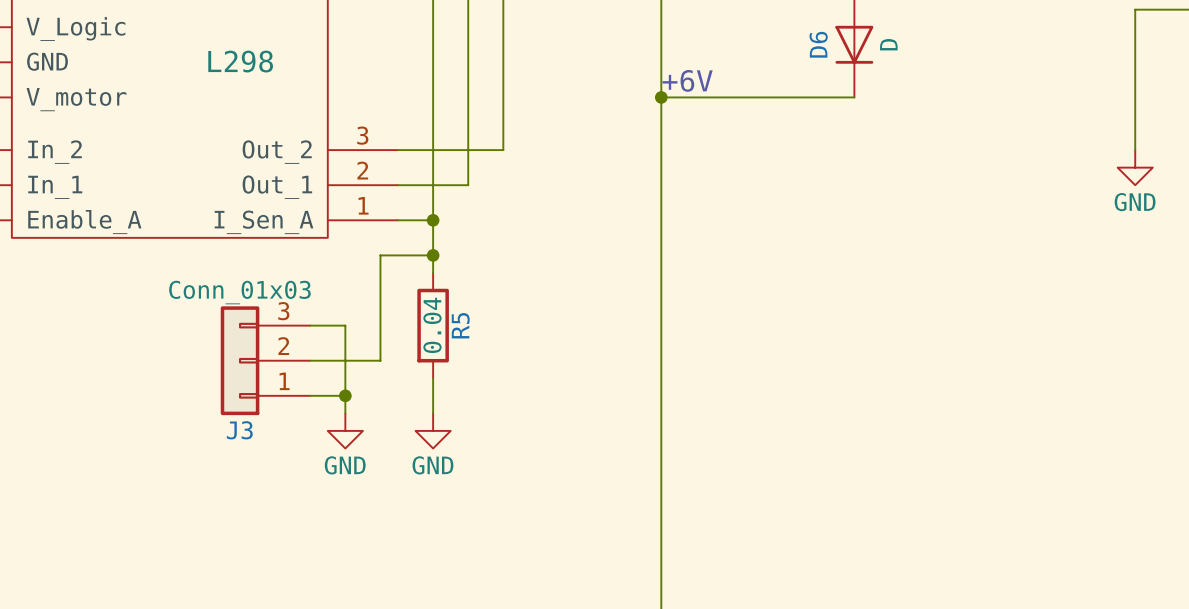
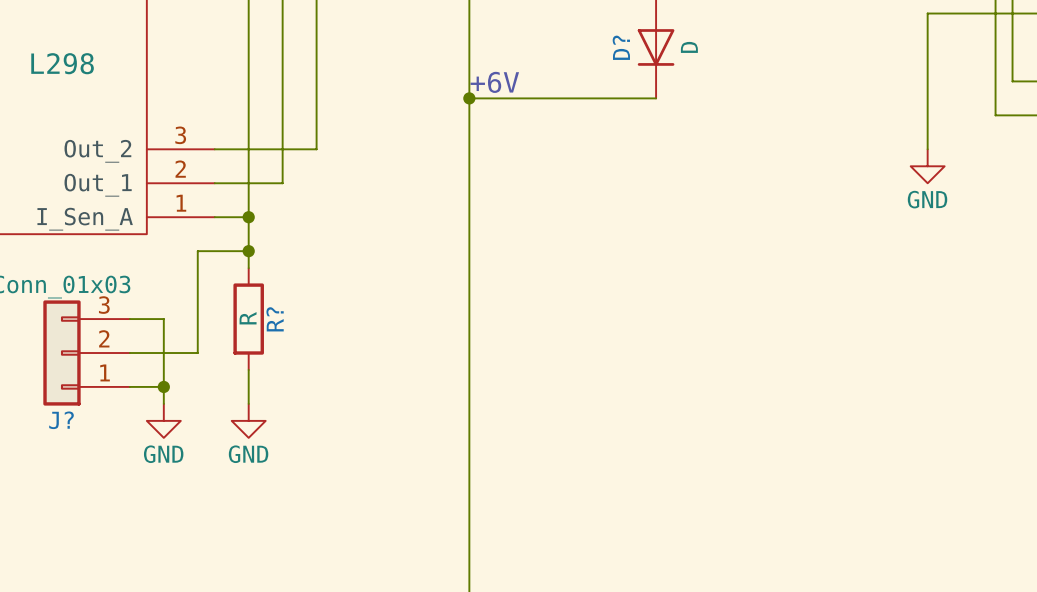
D6 name: D6 (818, 44) -> D? (621, 47)
R5 value: 0.04 (432, 325) -> R (248, 318)
R5 name: R5 (460, 325) -> R? (275, 319)
J3 name: J3 (239, 430) -> J? (61, 420)

